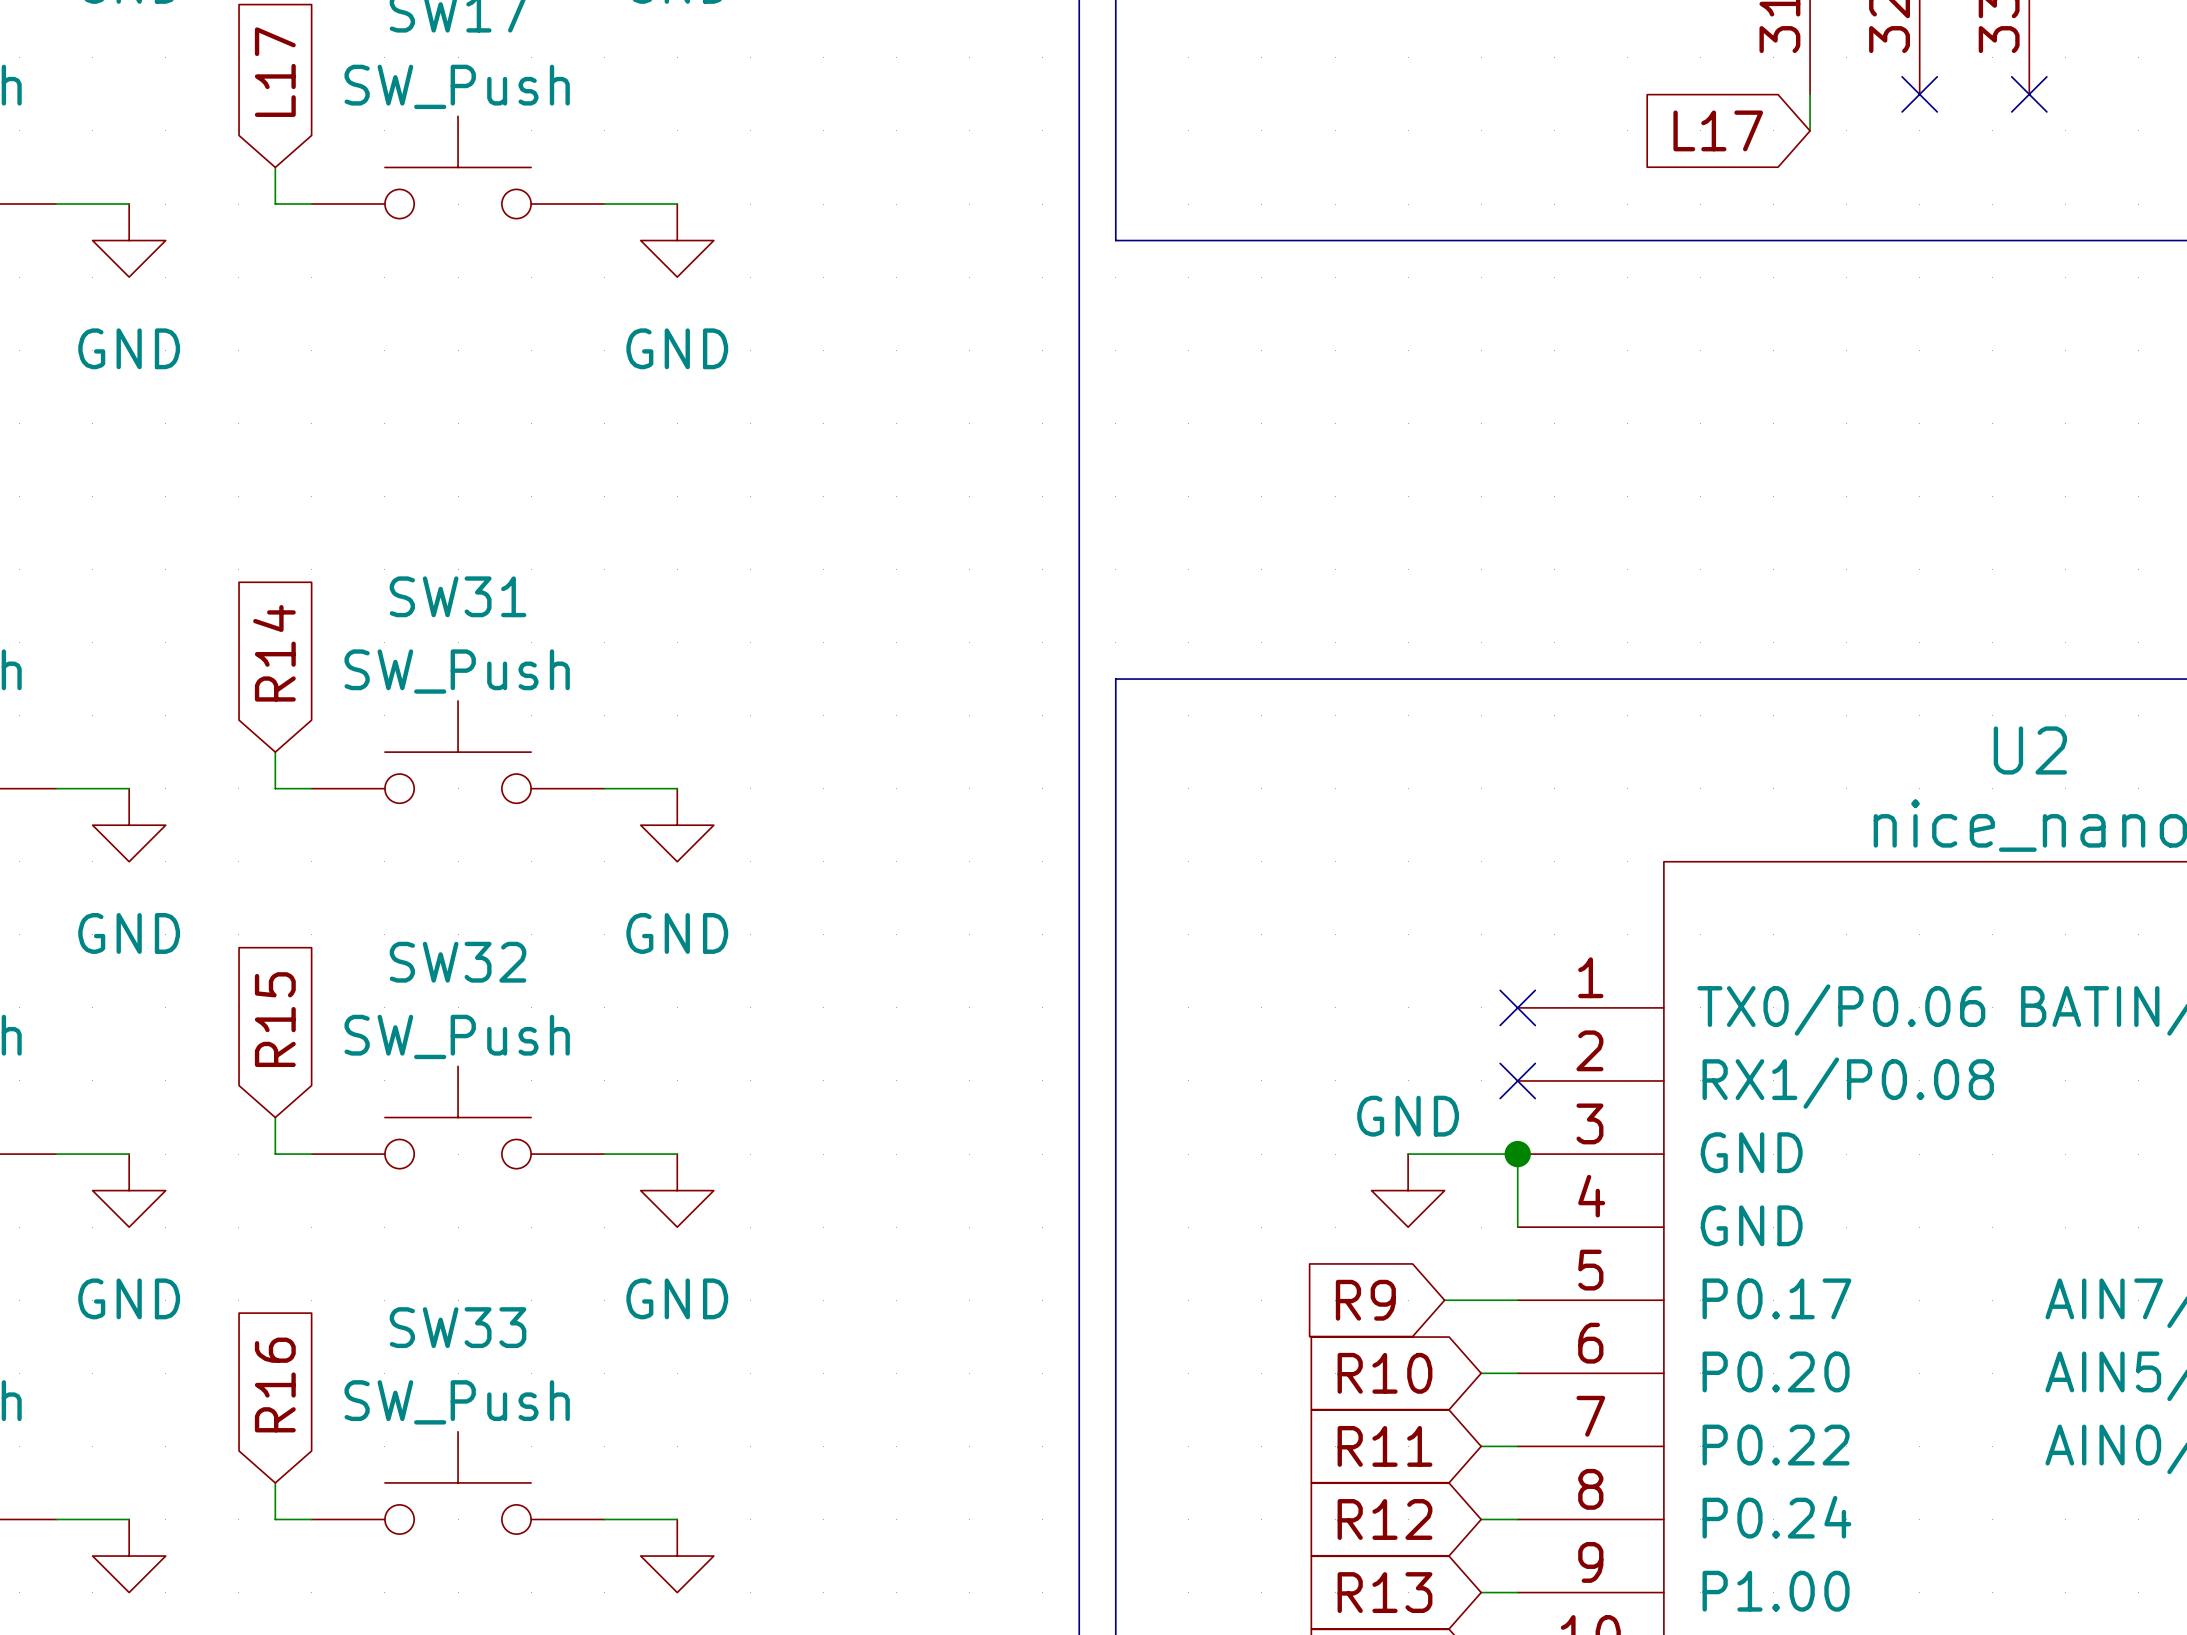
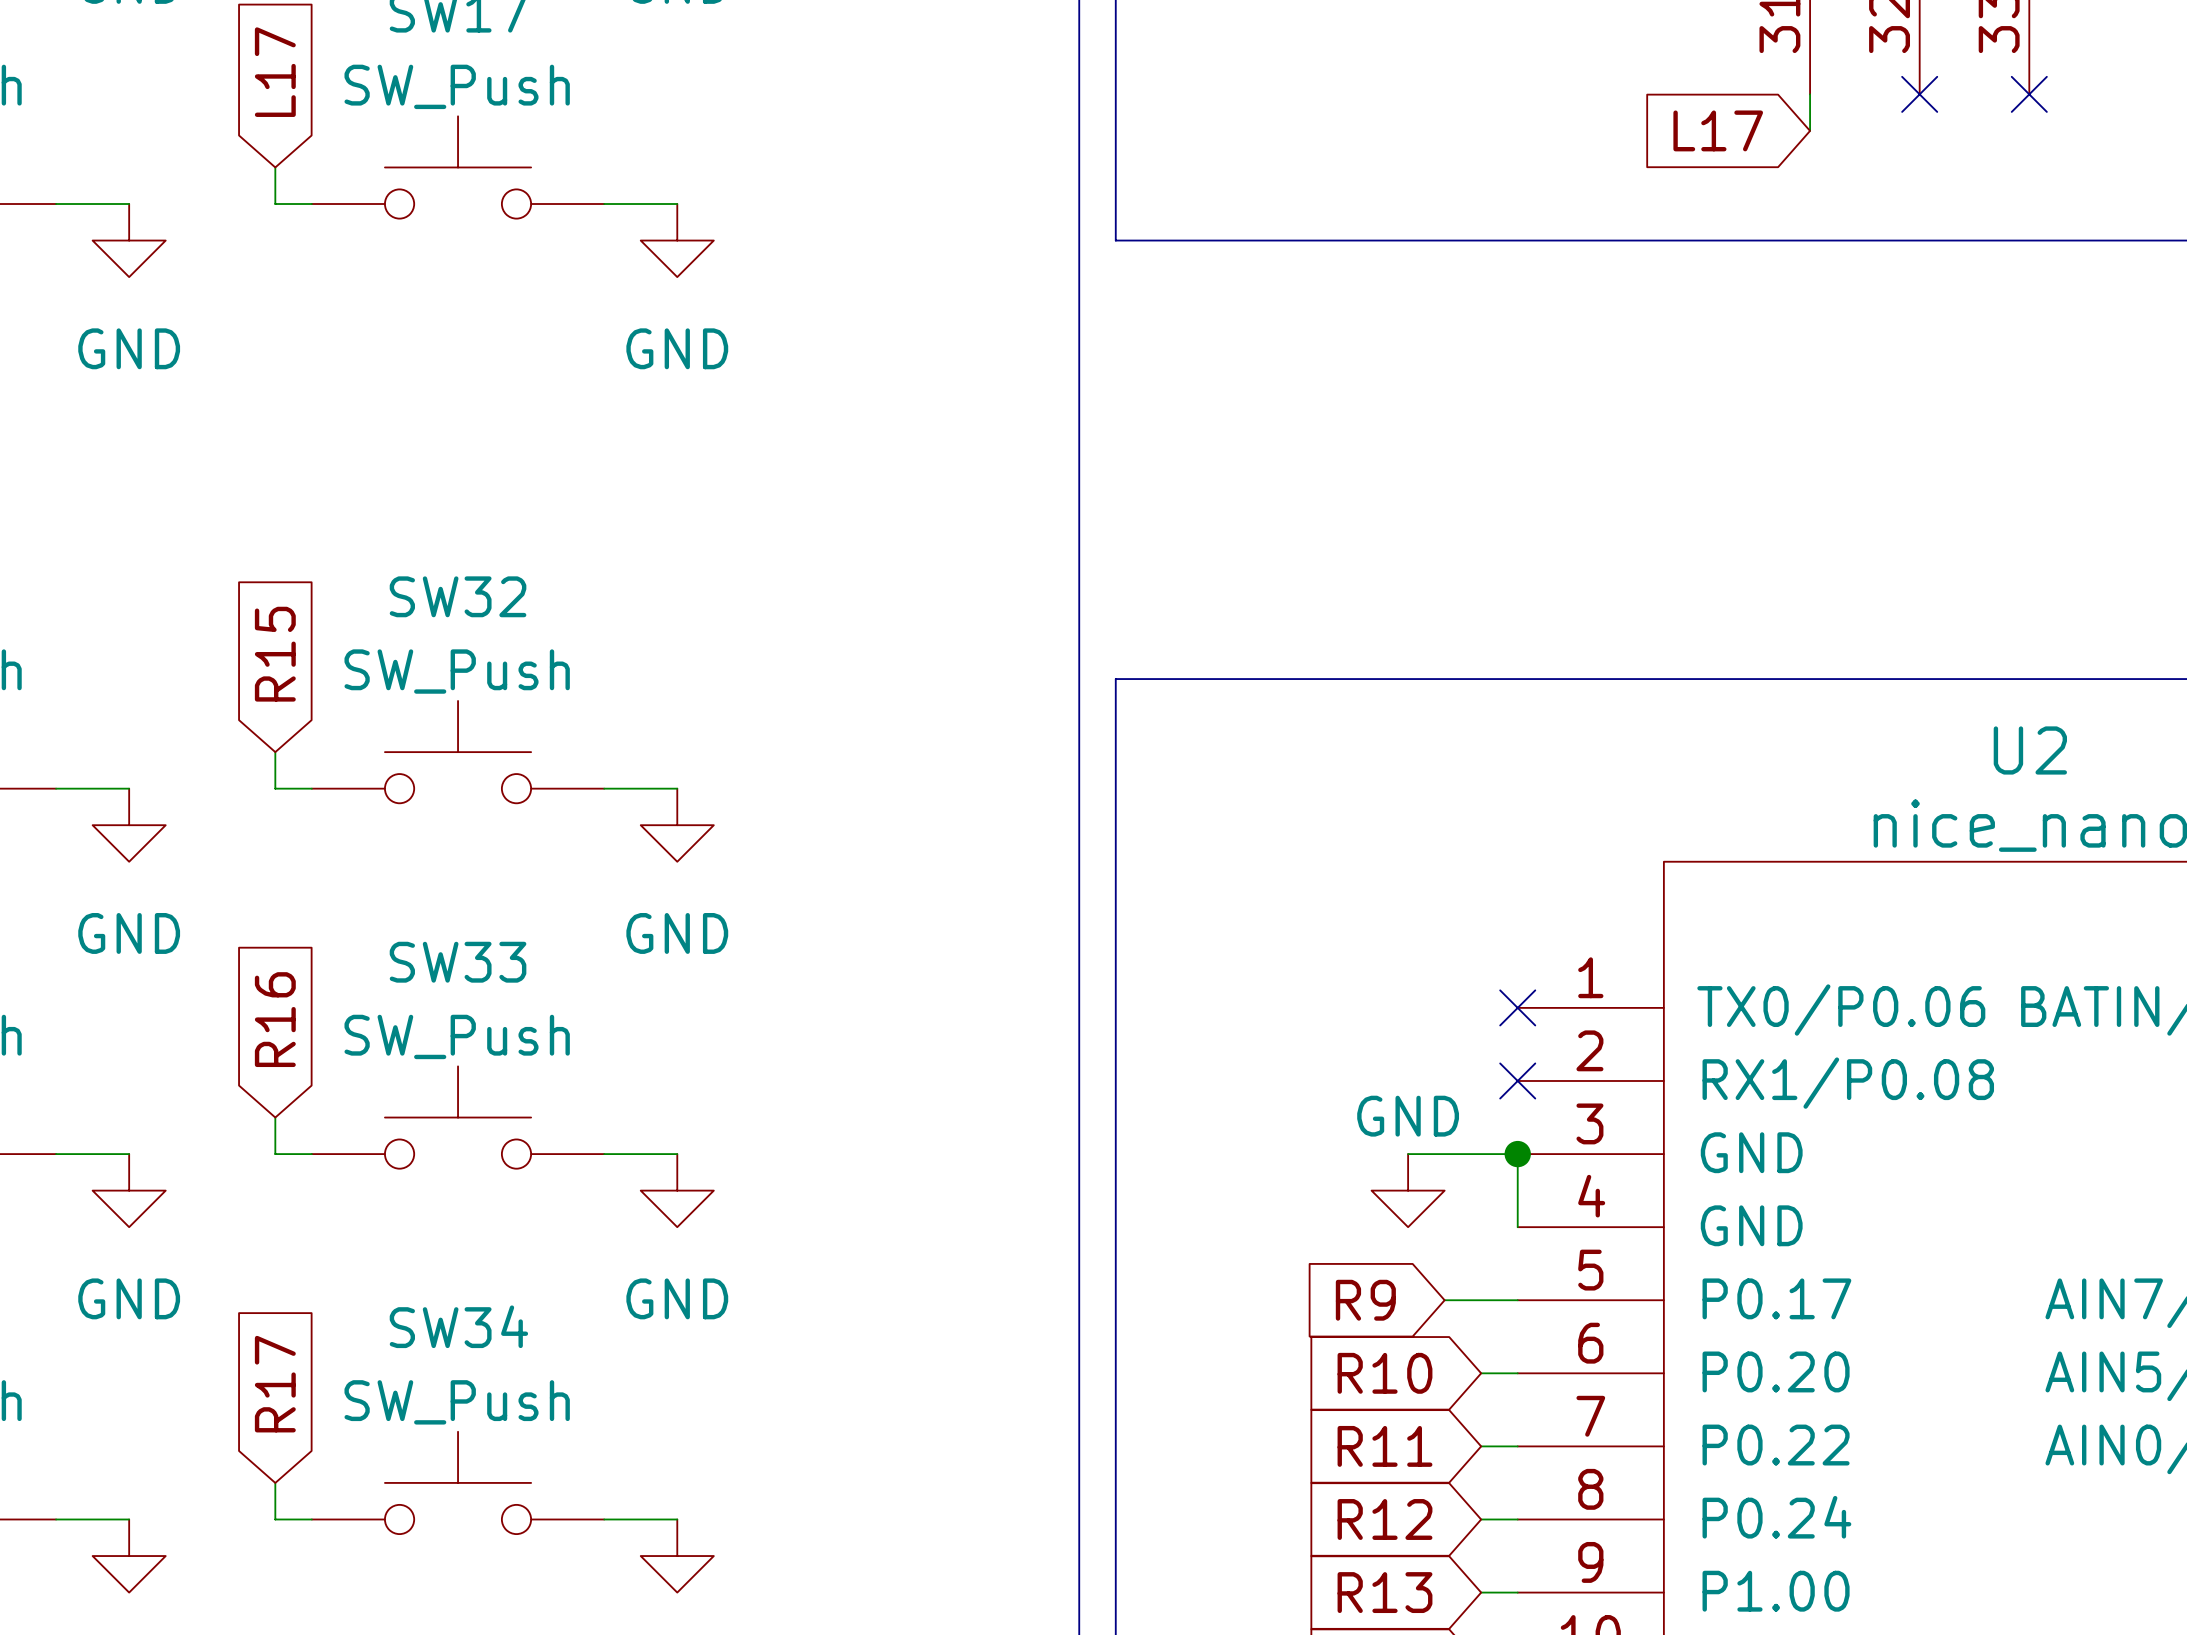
SW31 name: SW31 (458, 596) -> SW32 (458, 596)
global label: R14 (274, 653) -> R15 (275, 654)
SW32 name: SW32 (458, 962) -> SW33 (458, 962)
global label: R15 (275, 1019) -> R16 (275, 1019)
SW33 name: SW33 (458, 1327) -> SW34 (458, 1326)
global label: R16 (275, 1385) -> R17 (275, 1384)

